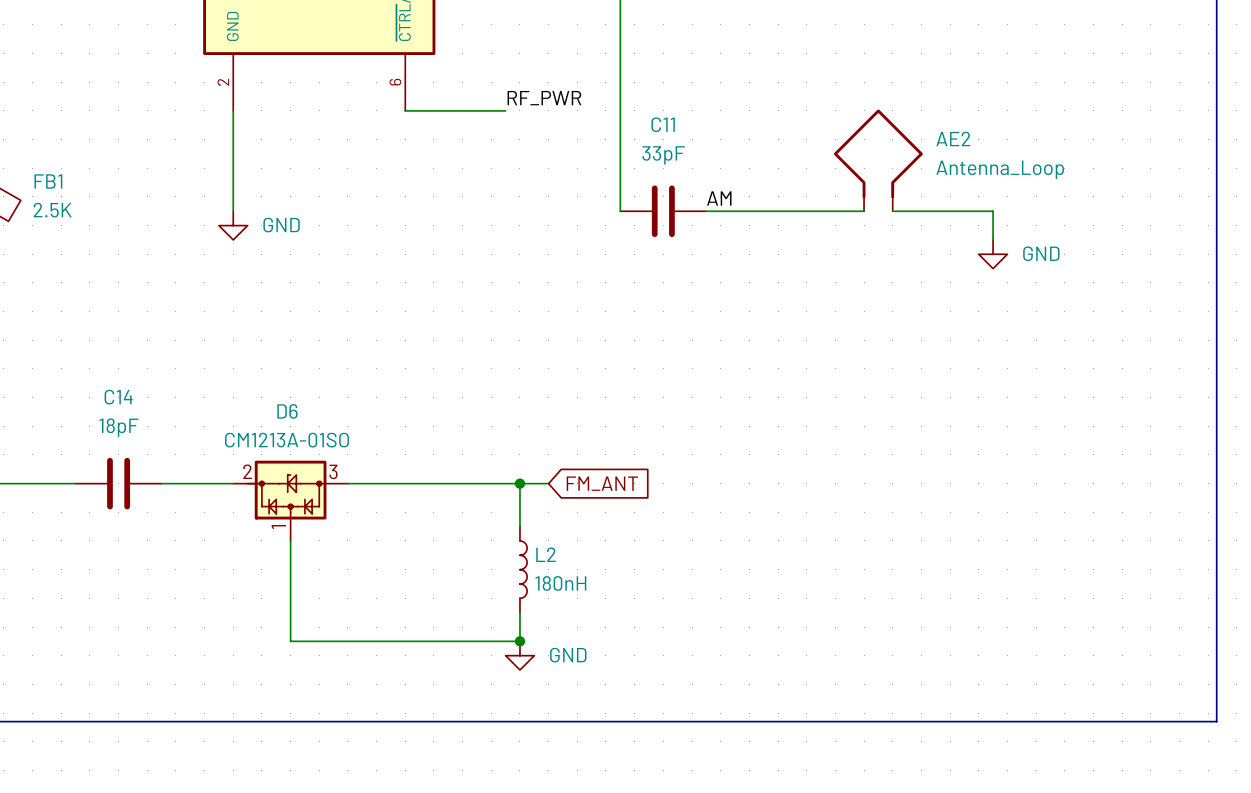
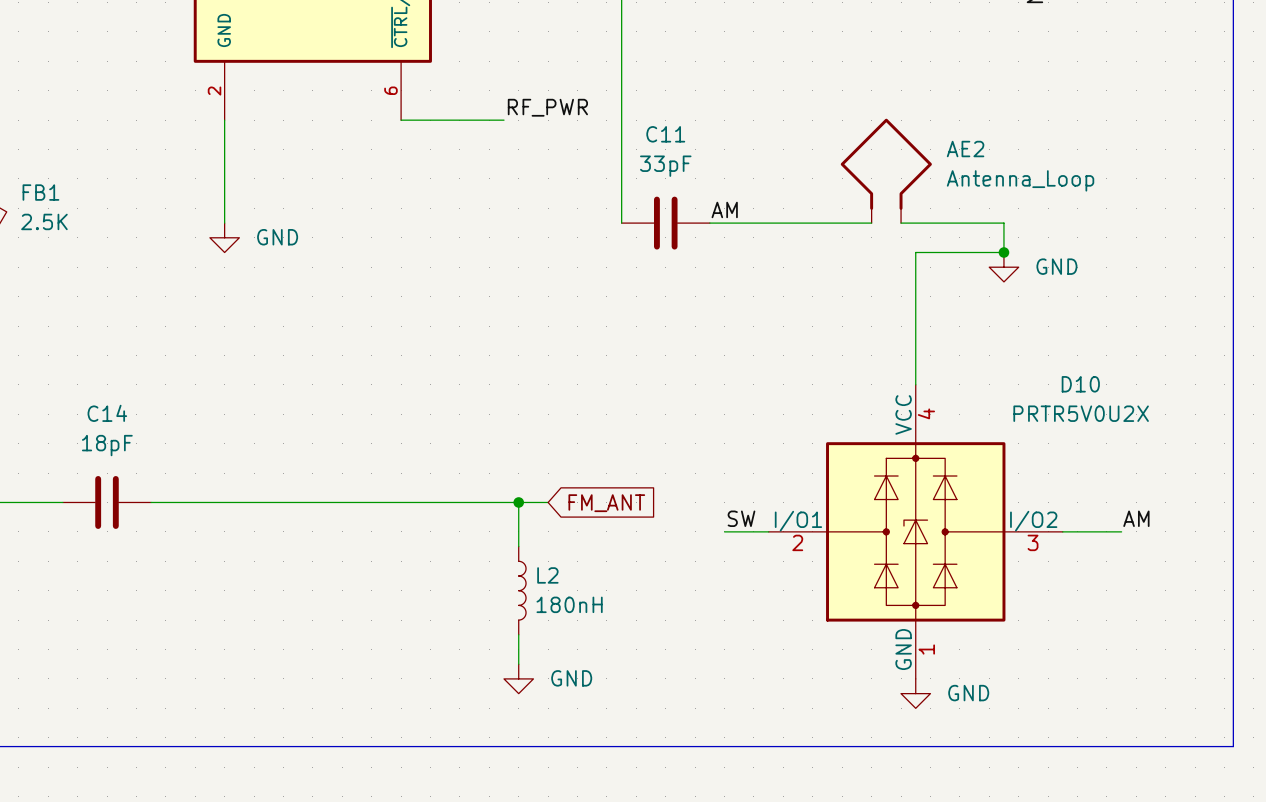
wire: none -> (1003, 252) (915, 252) (915, 384)
junction: none -> (1003, 252)
label: none -> SW (741, 518)
label: none -> AM (1136, 518)
D6: CM1213A-01SO (290, 500) -> none
wire: none -> (724, 531) (768, 531)
D10: none -> PRTR5V0U2X (915, 531)
wire: none -> (1062, 531) (1121, 531)
wire: (290, 540) (290, 641) (519, 641) -> none
junction: (519, 641) -> none
power symbol: none -> GND (915, 693)

